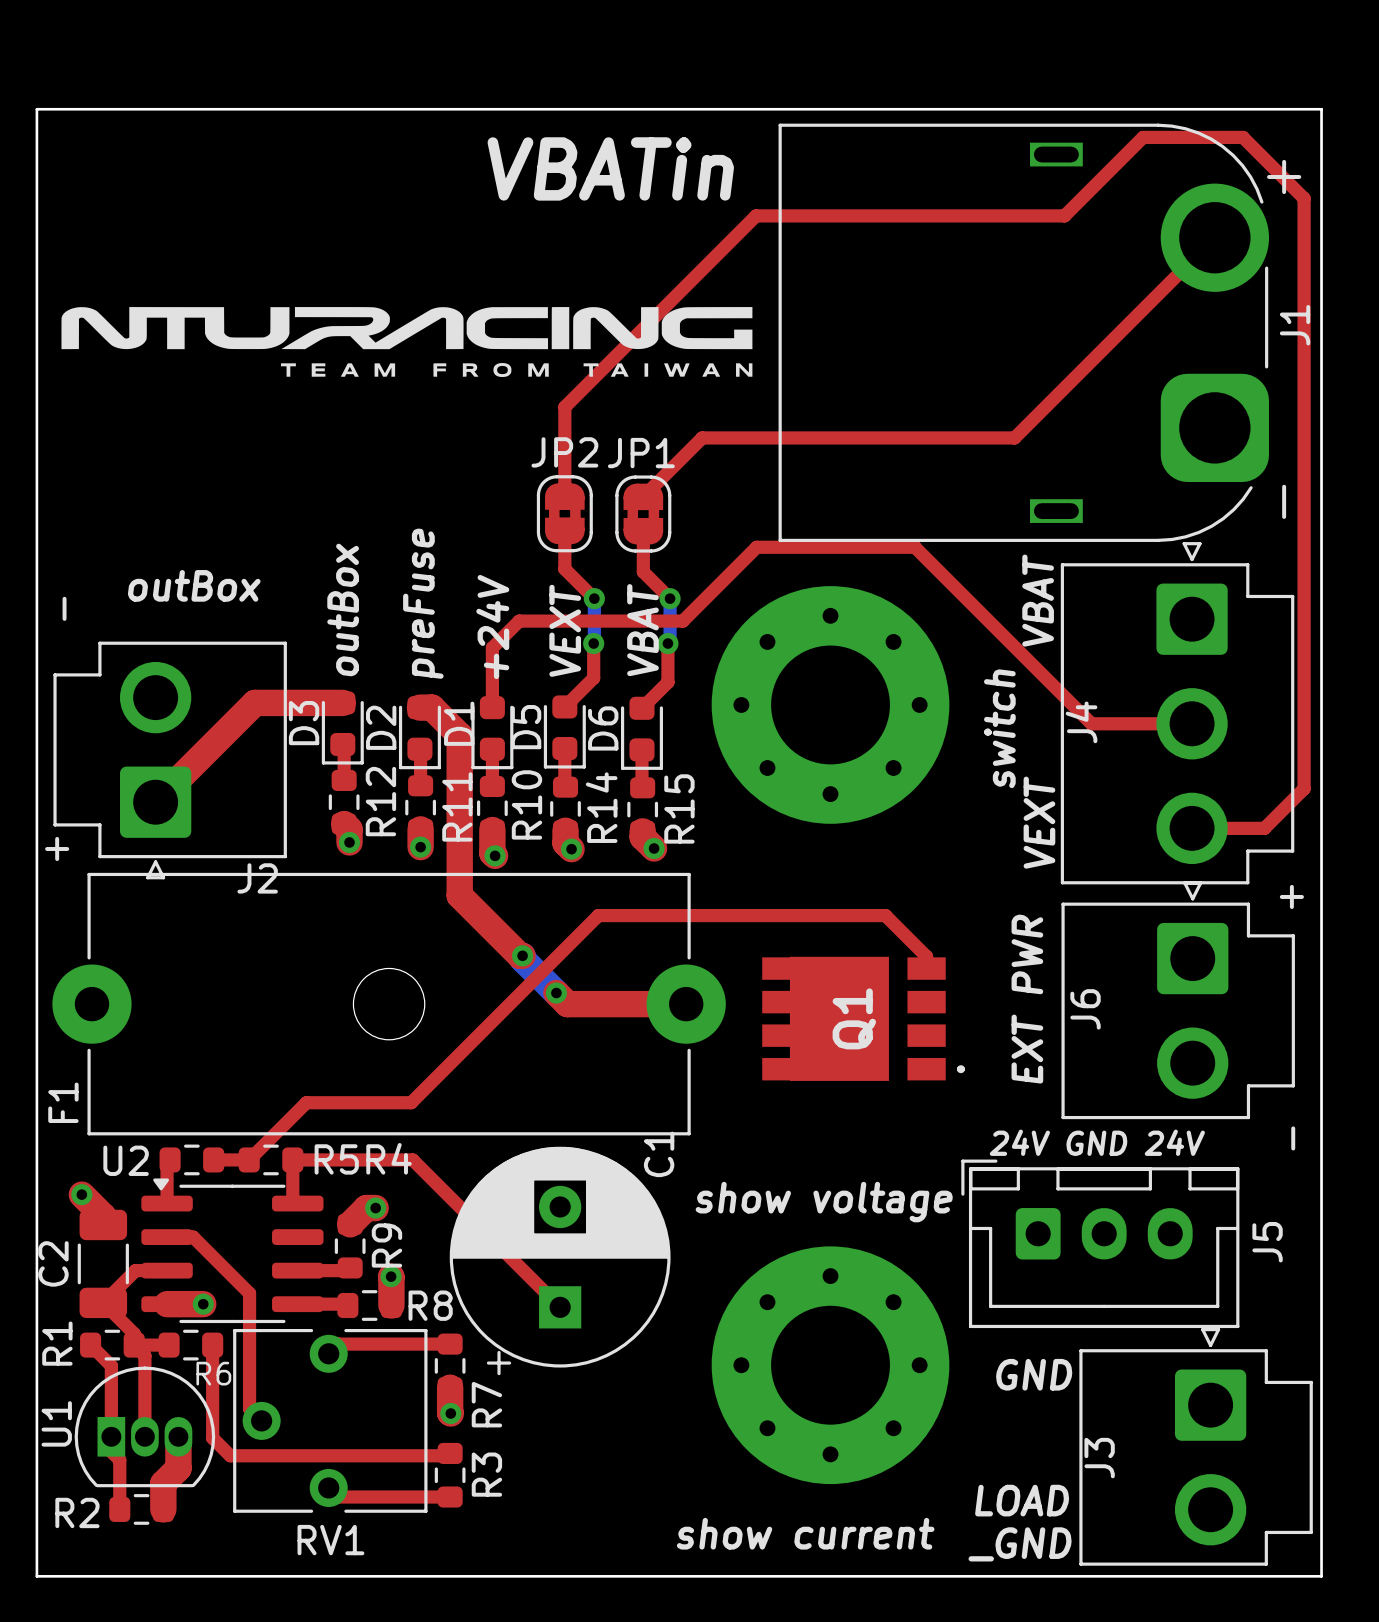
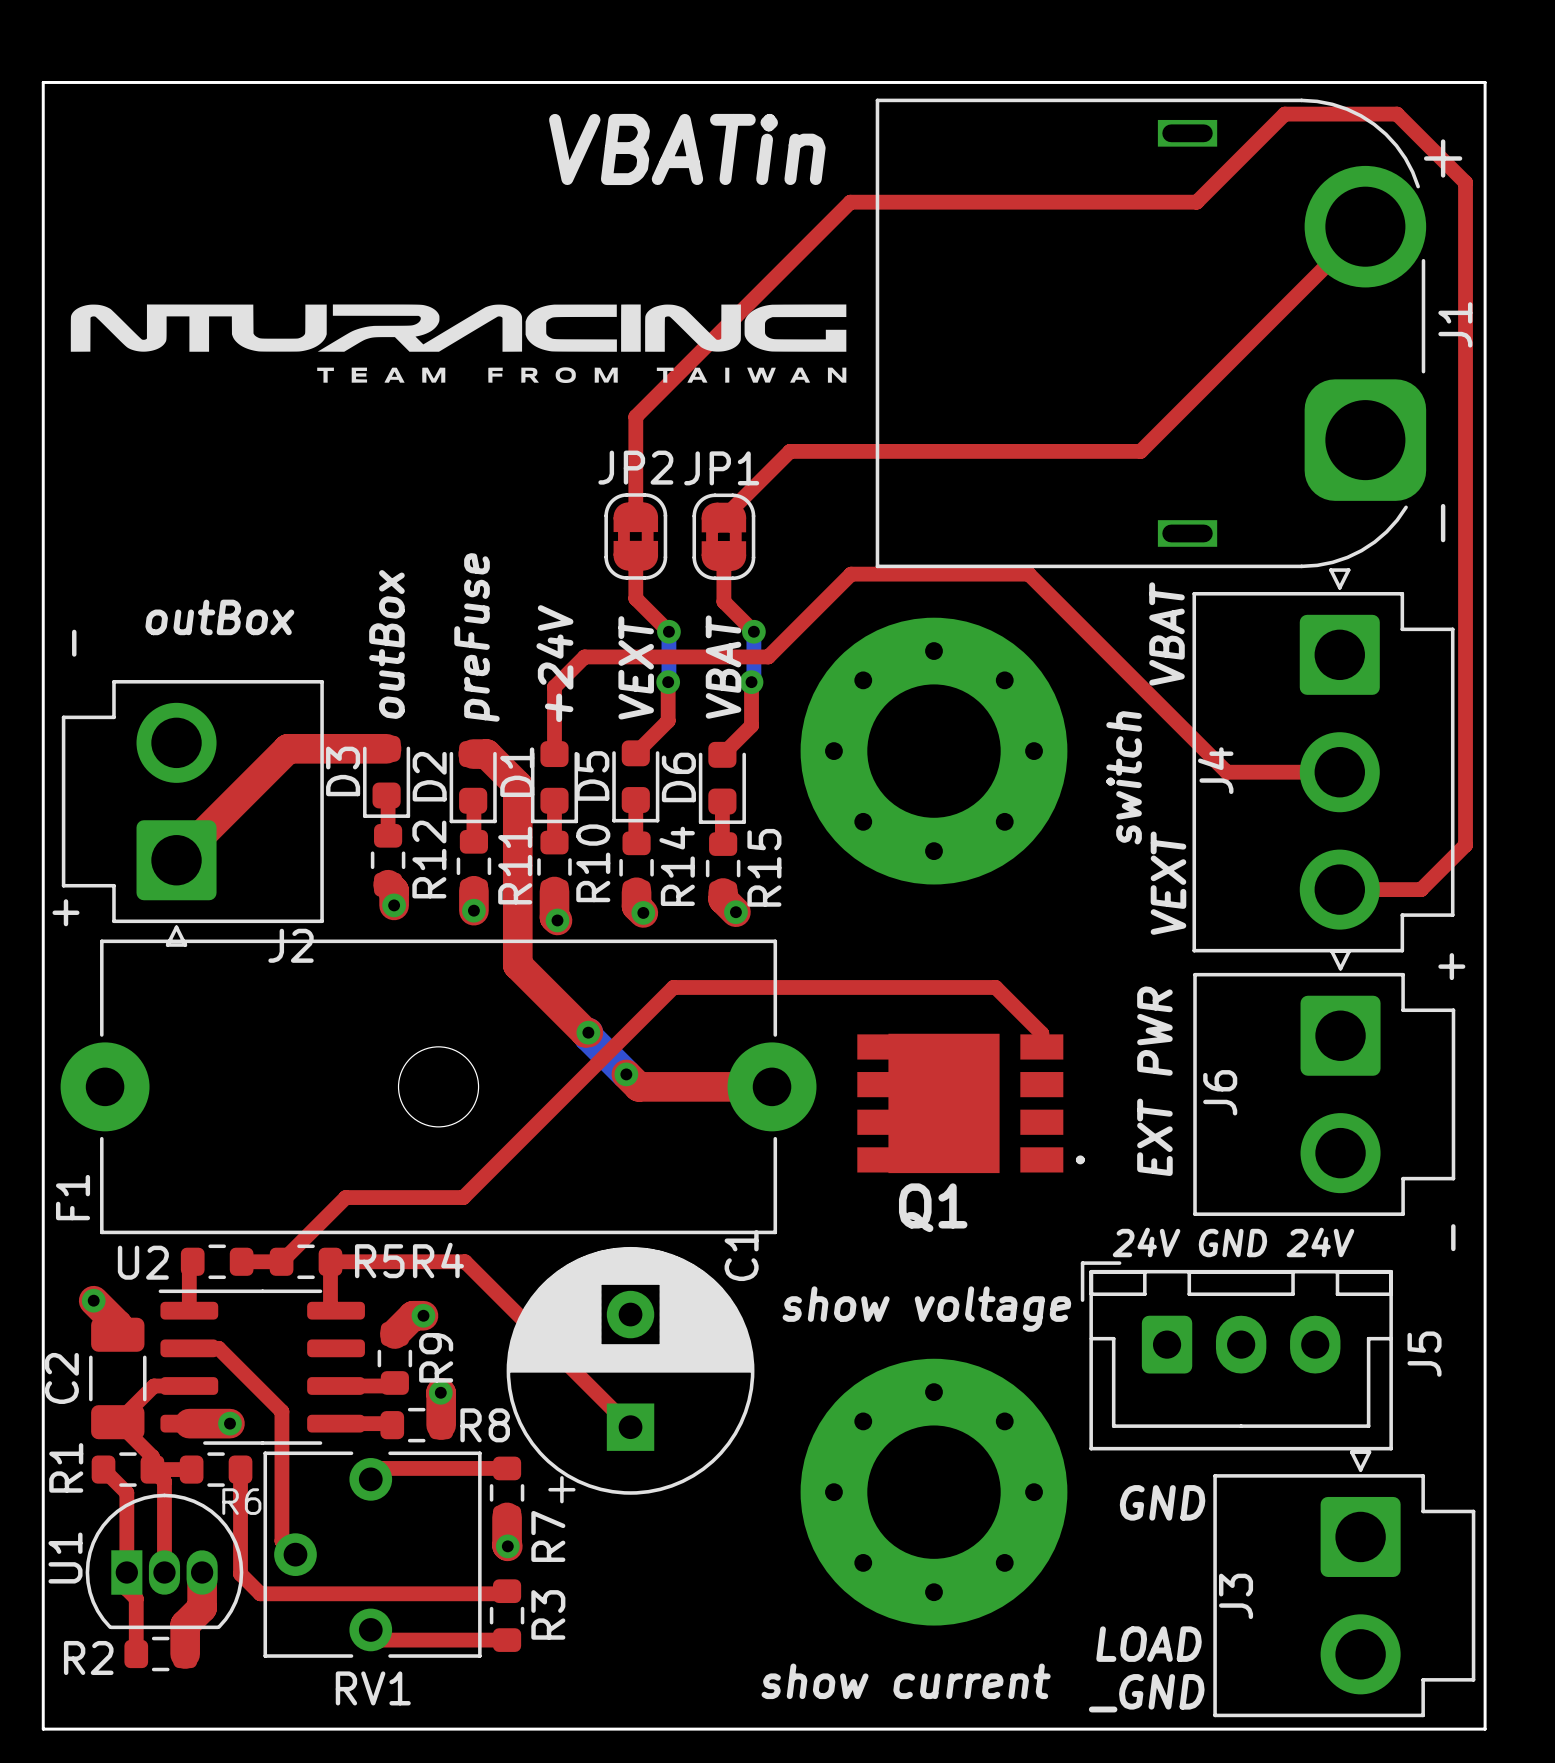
Q1 name rotation: 0° (854, 1018) -> 90° clockwise (933, 1207)
Q1 name position: Q1 (854, 1018) -> Q1 (933, 1207)
U2 footprint: [141, 1178, 324, 1324] -> [158, 1289, 365, 1445]

